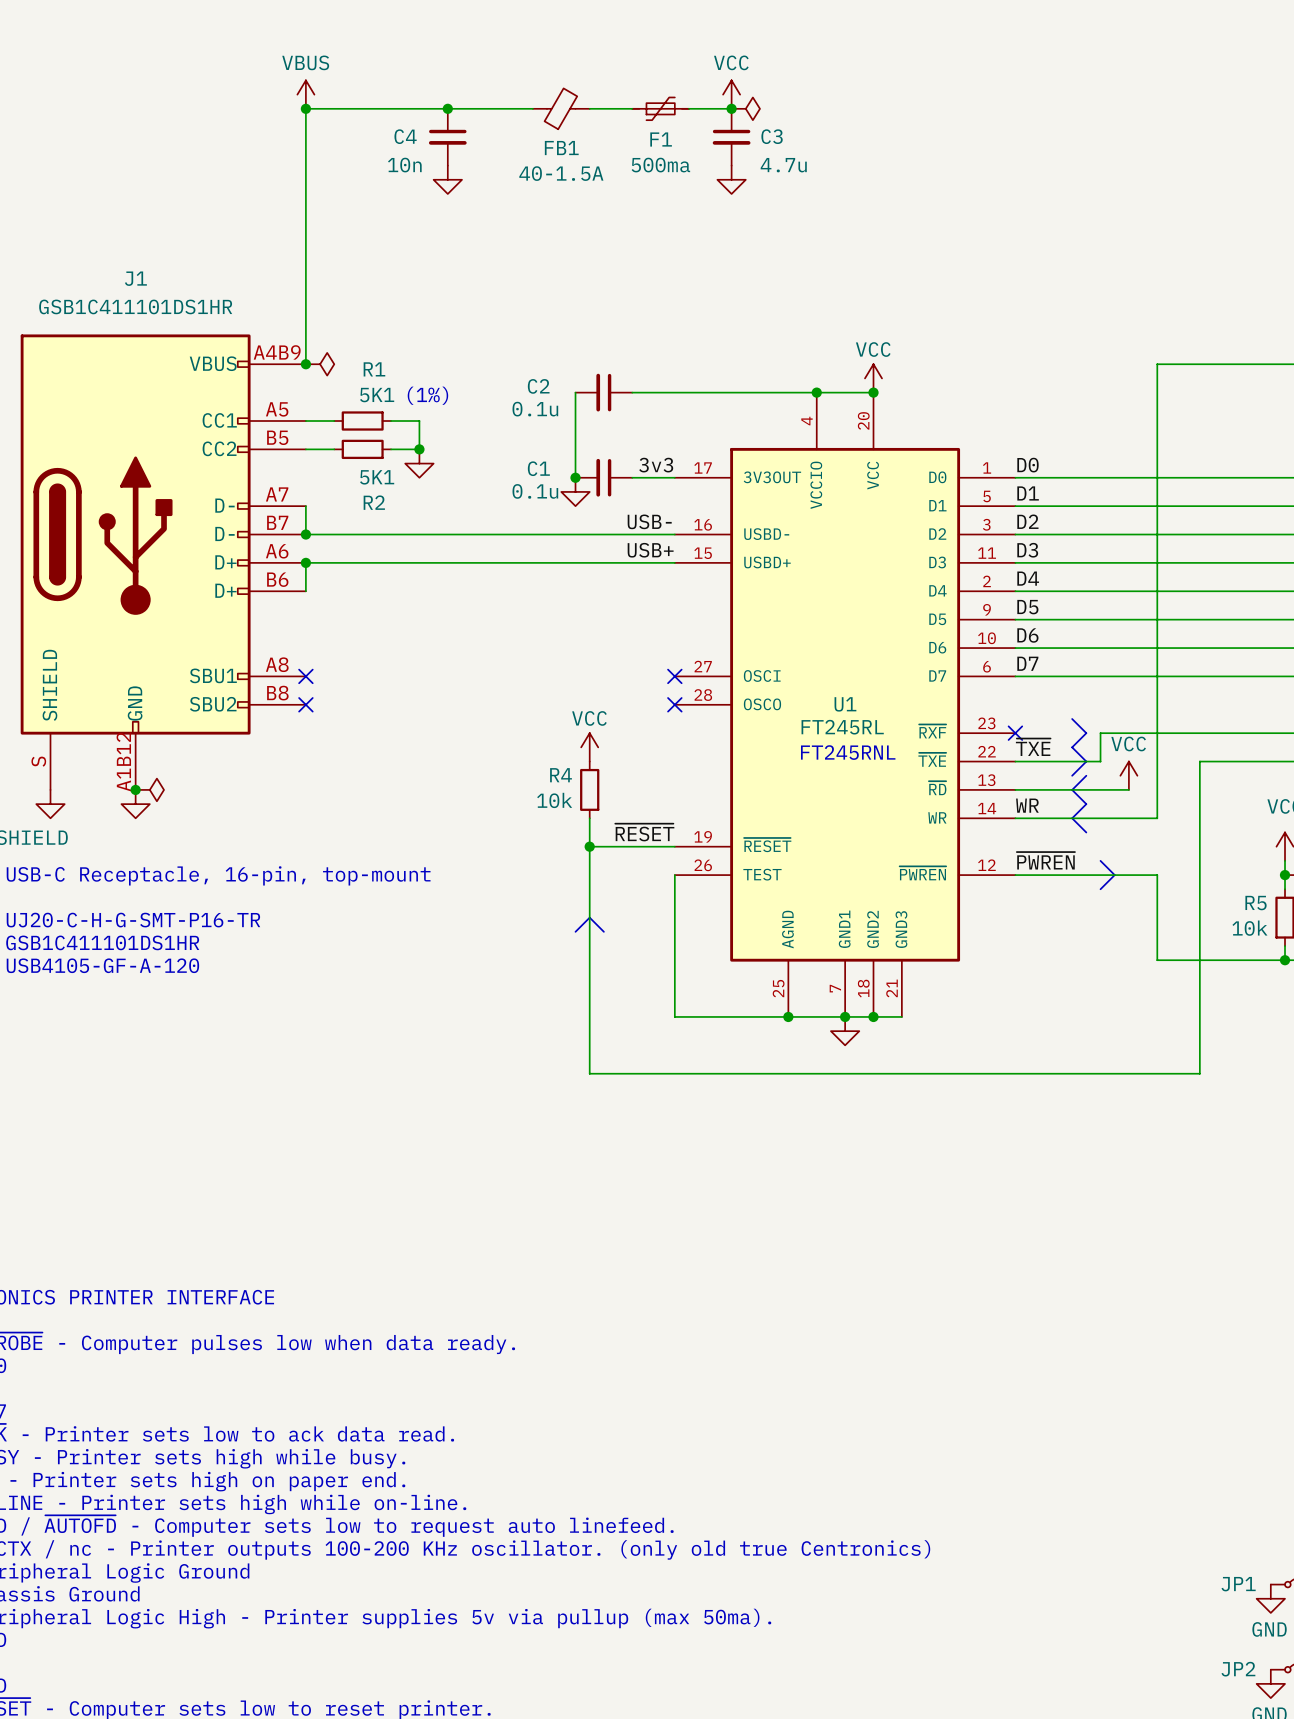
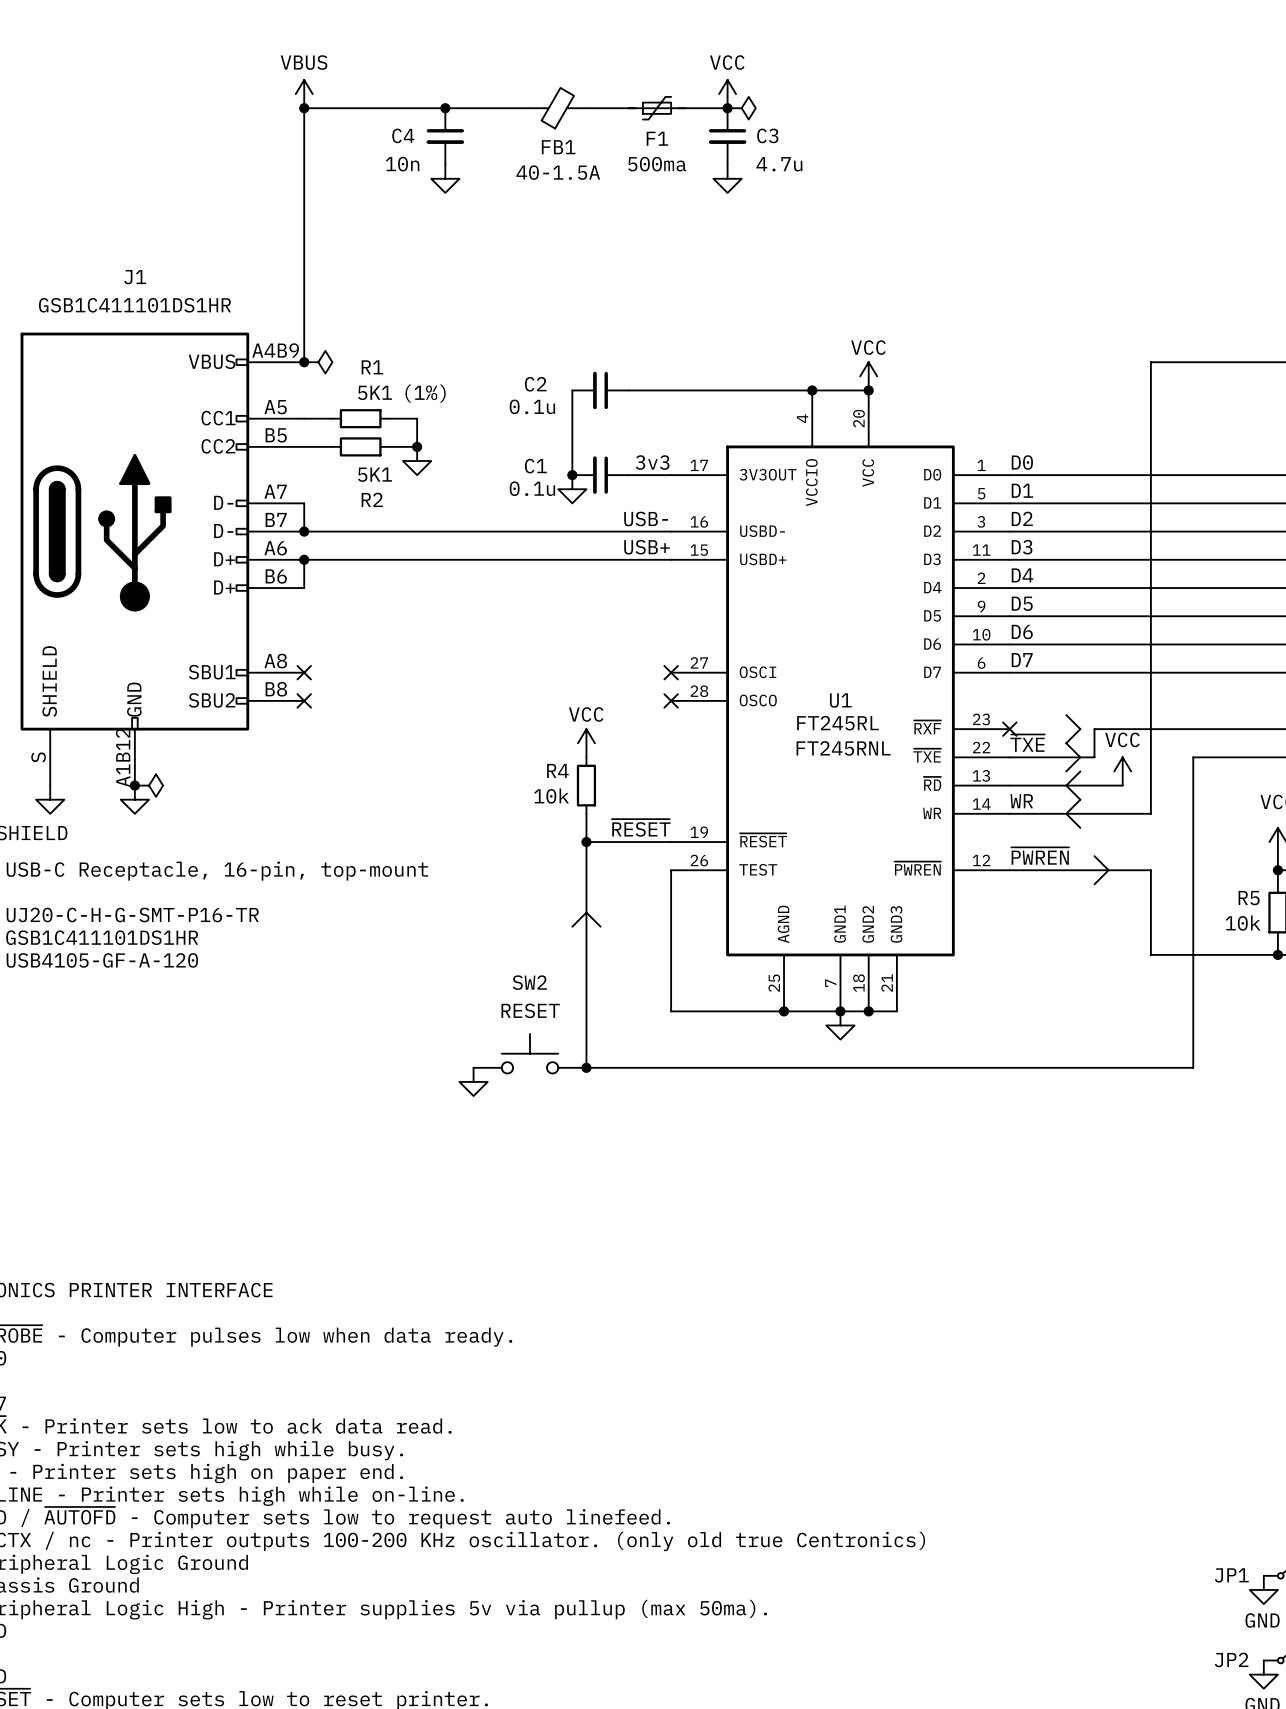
SW2: none -> RESET (530, 1053)
junction: none -> (586, 1067)
power symbol: none -> (473, 1081)

